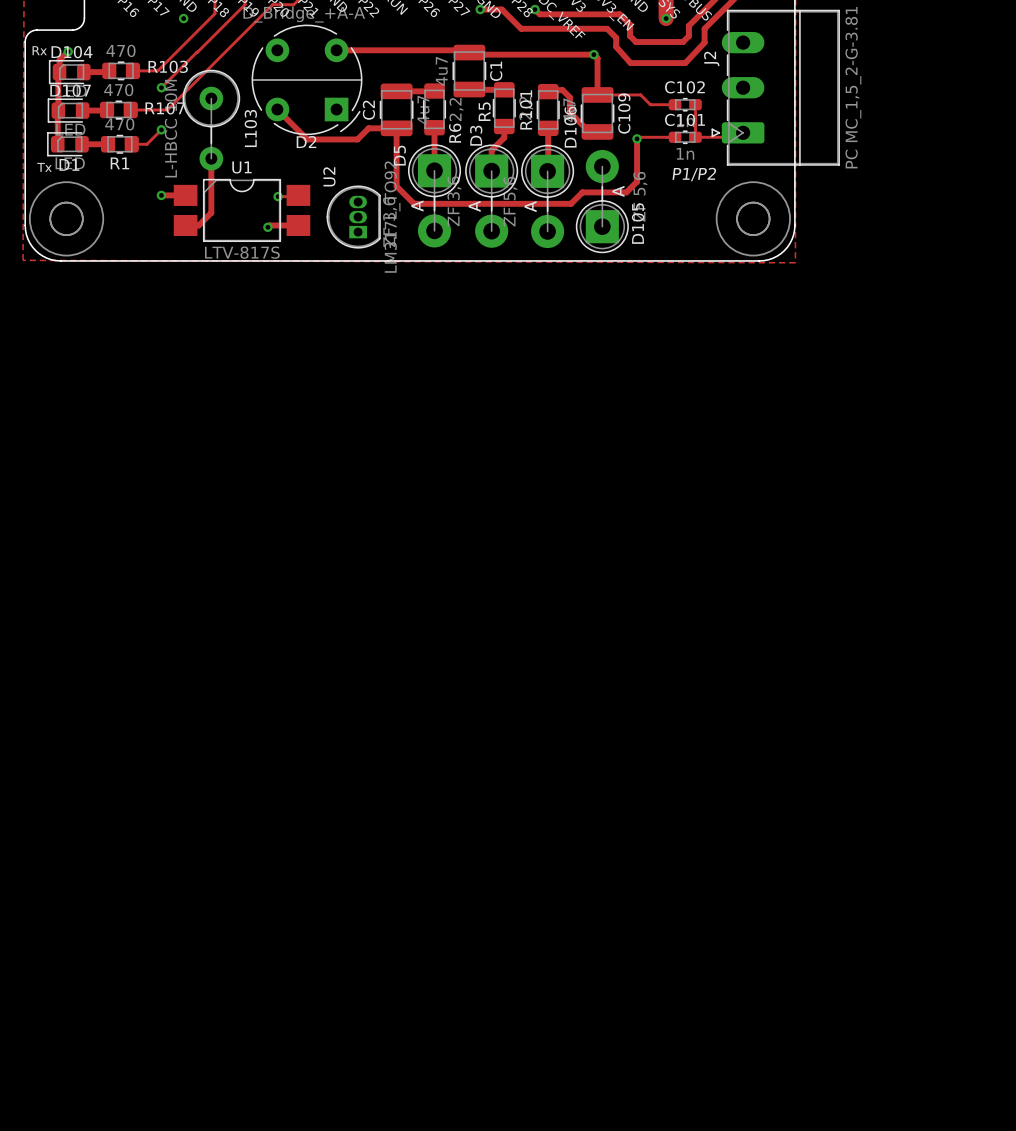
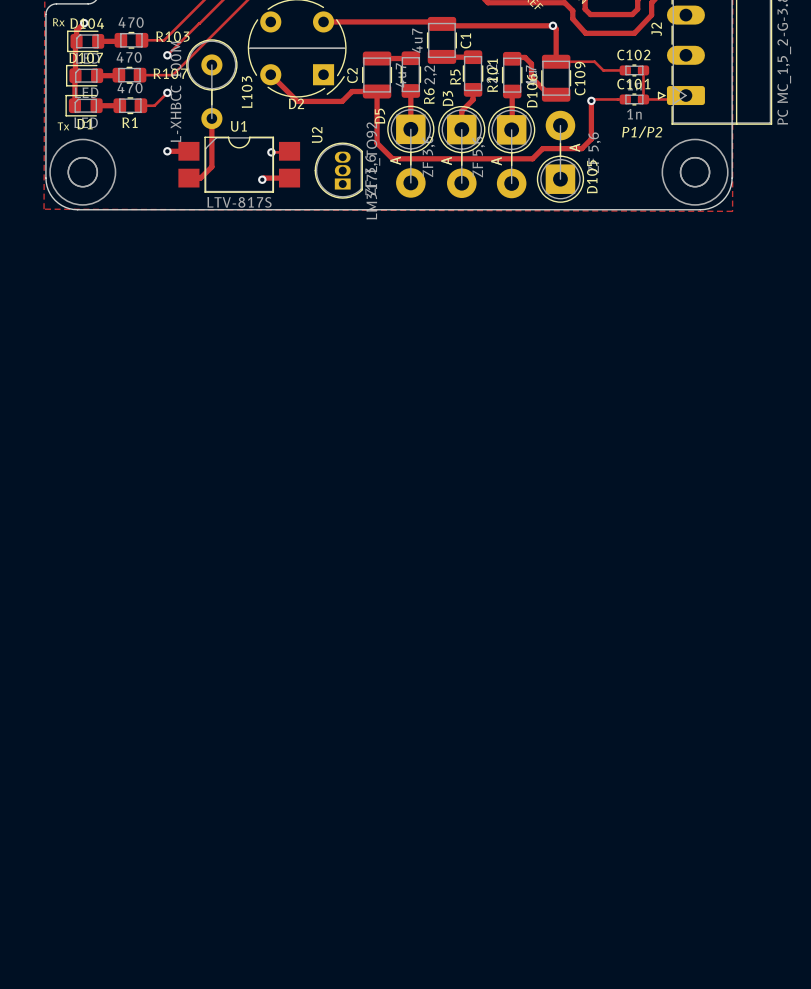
L103 value: L-HBCC 10M (171, 128) -> L-XHBCC 100M (175, 91)

